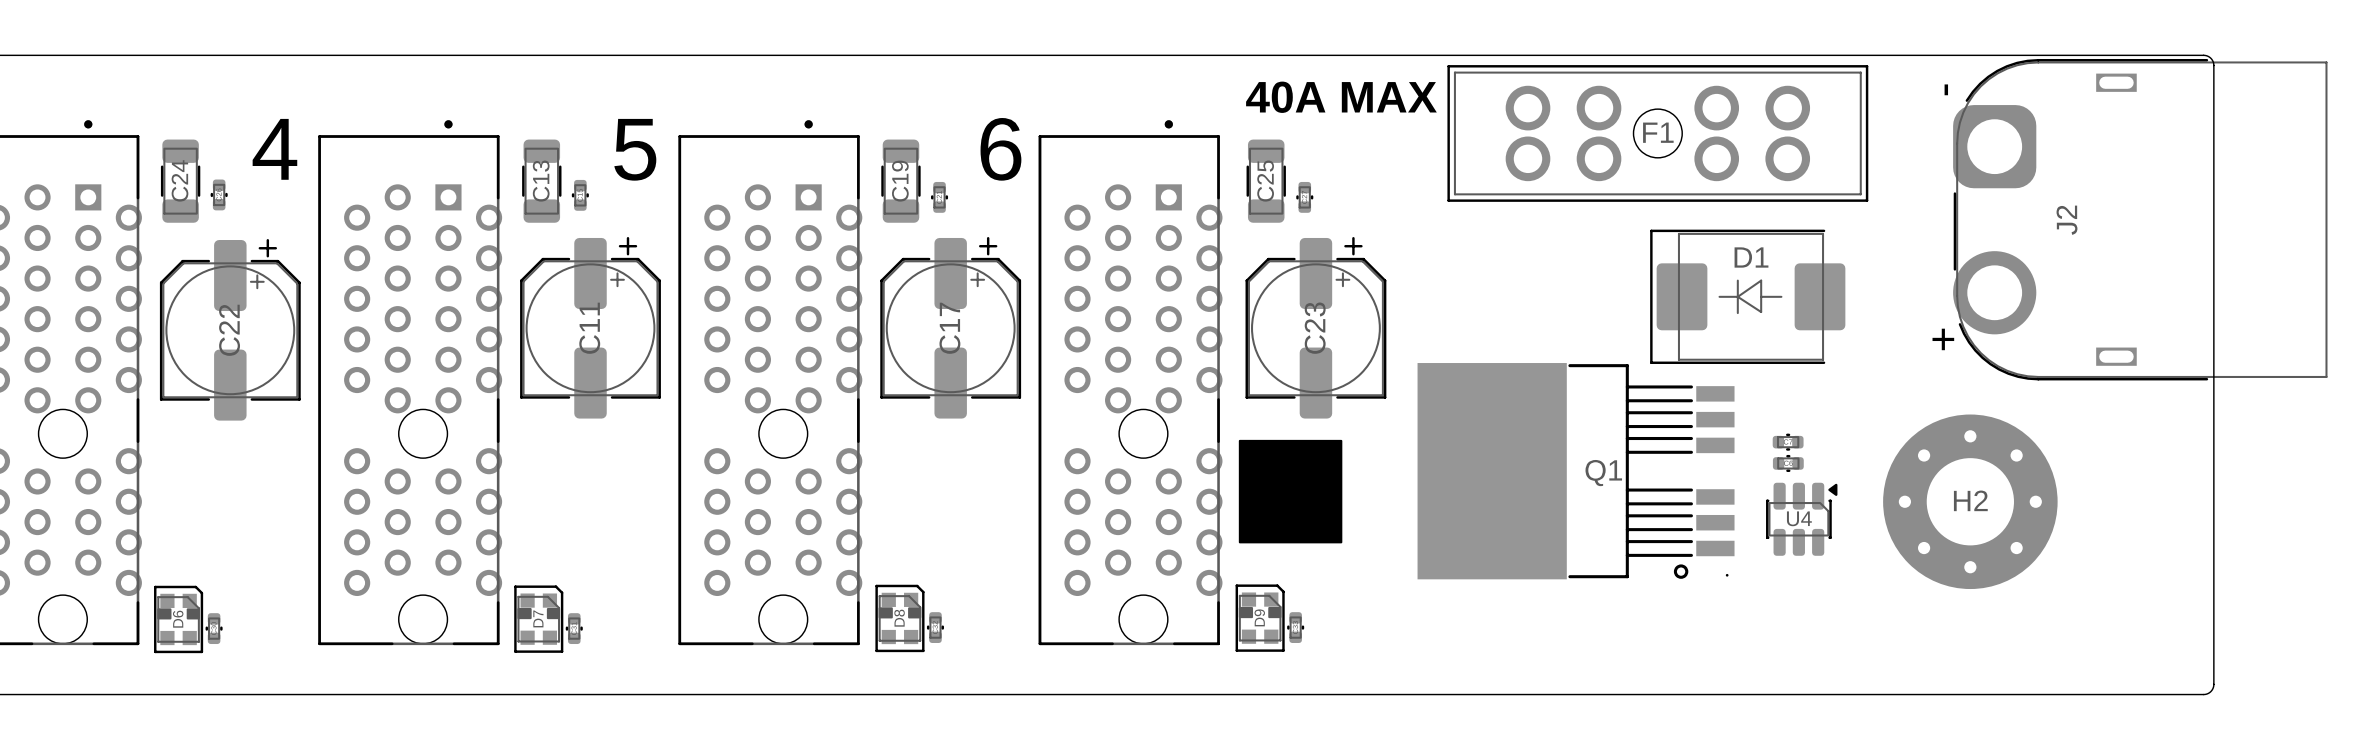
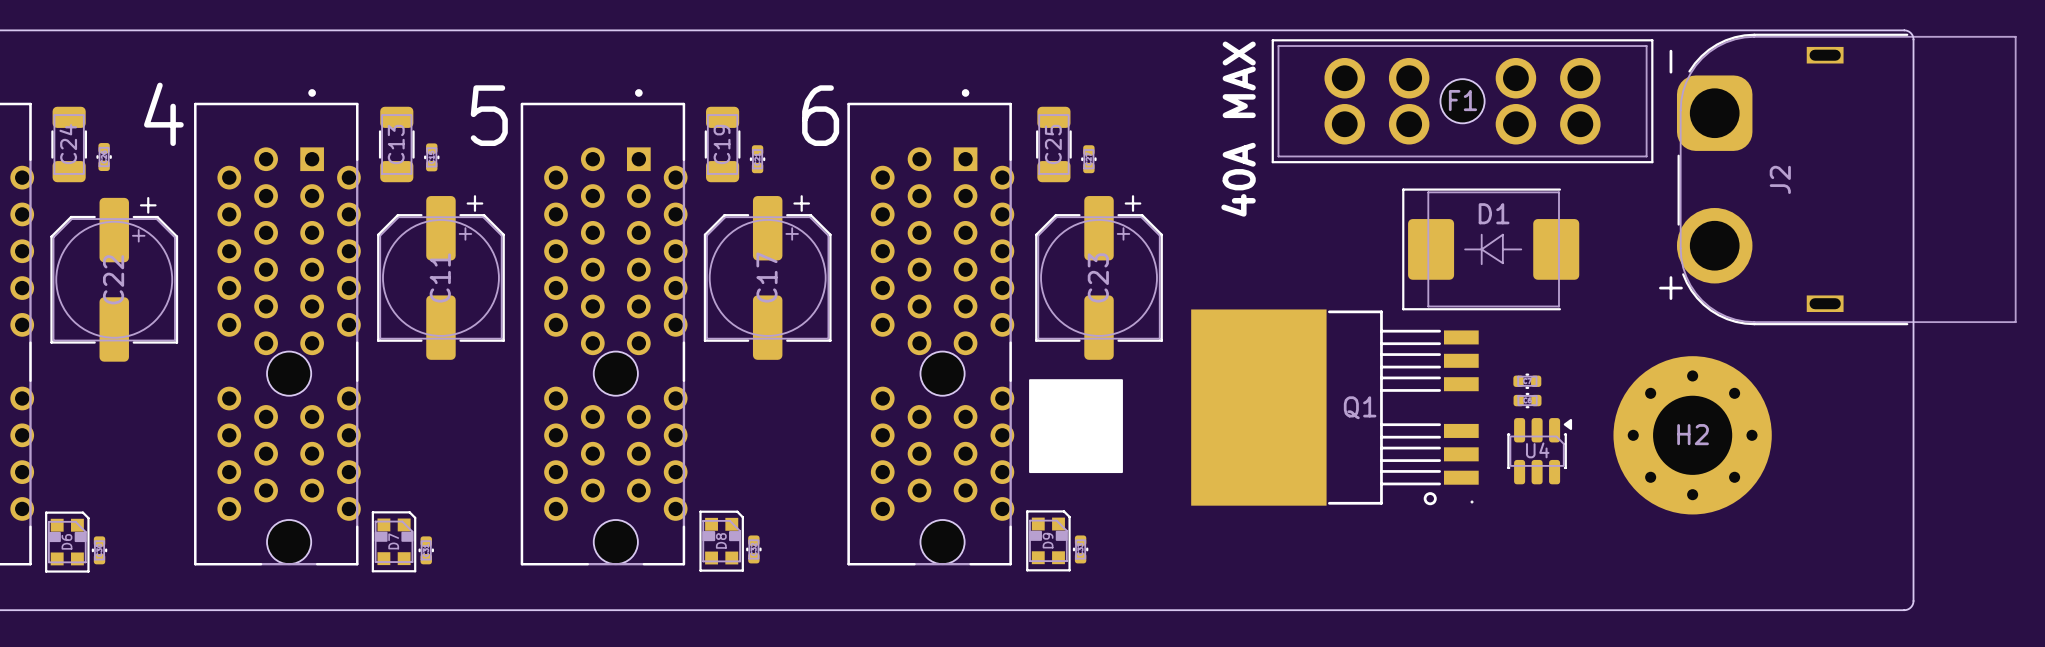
text rotation: 0° (1341, 97) -> 90° counterclockwise (1238, 129)
F1 position: (1657, 133) -> (1462, 101)

